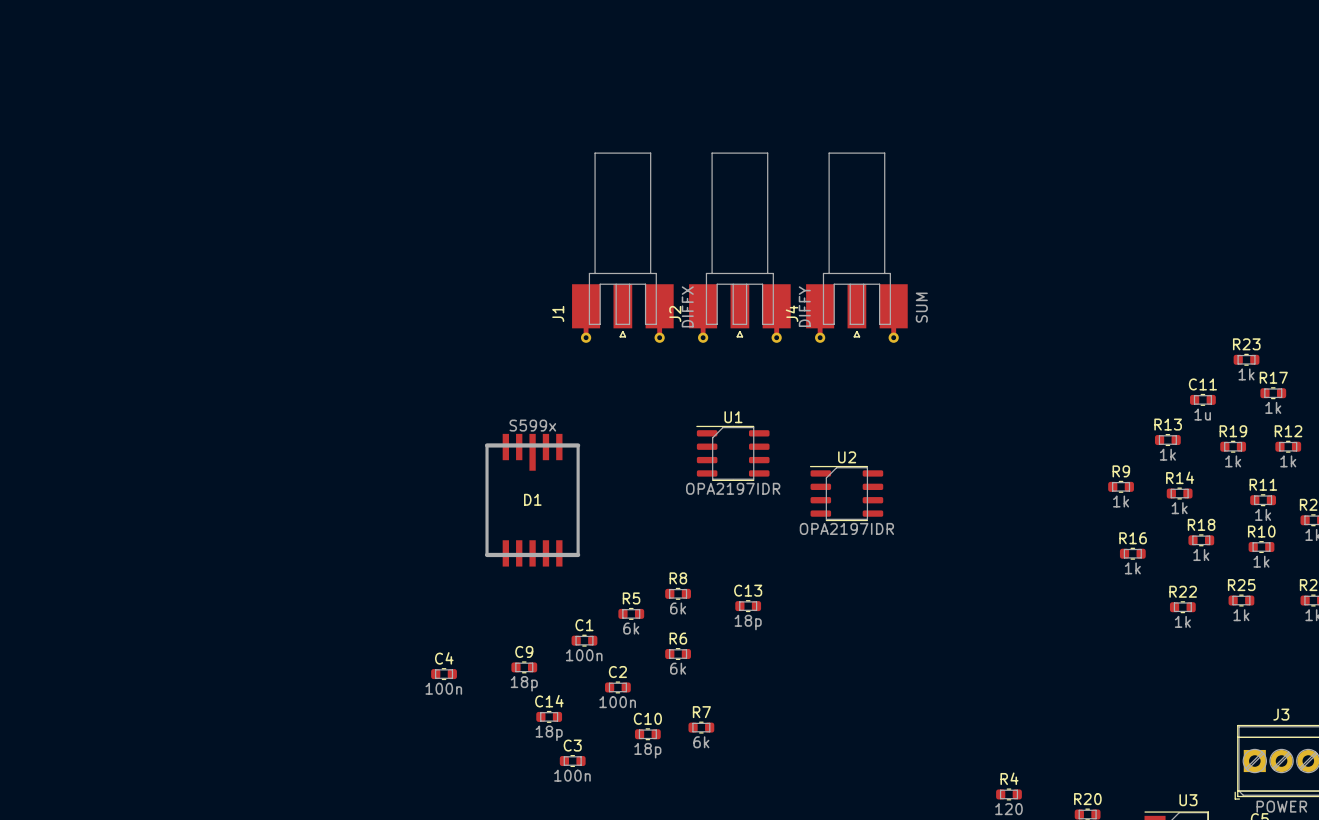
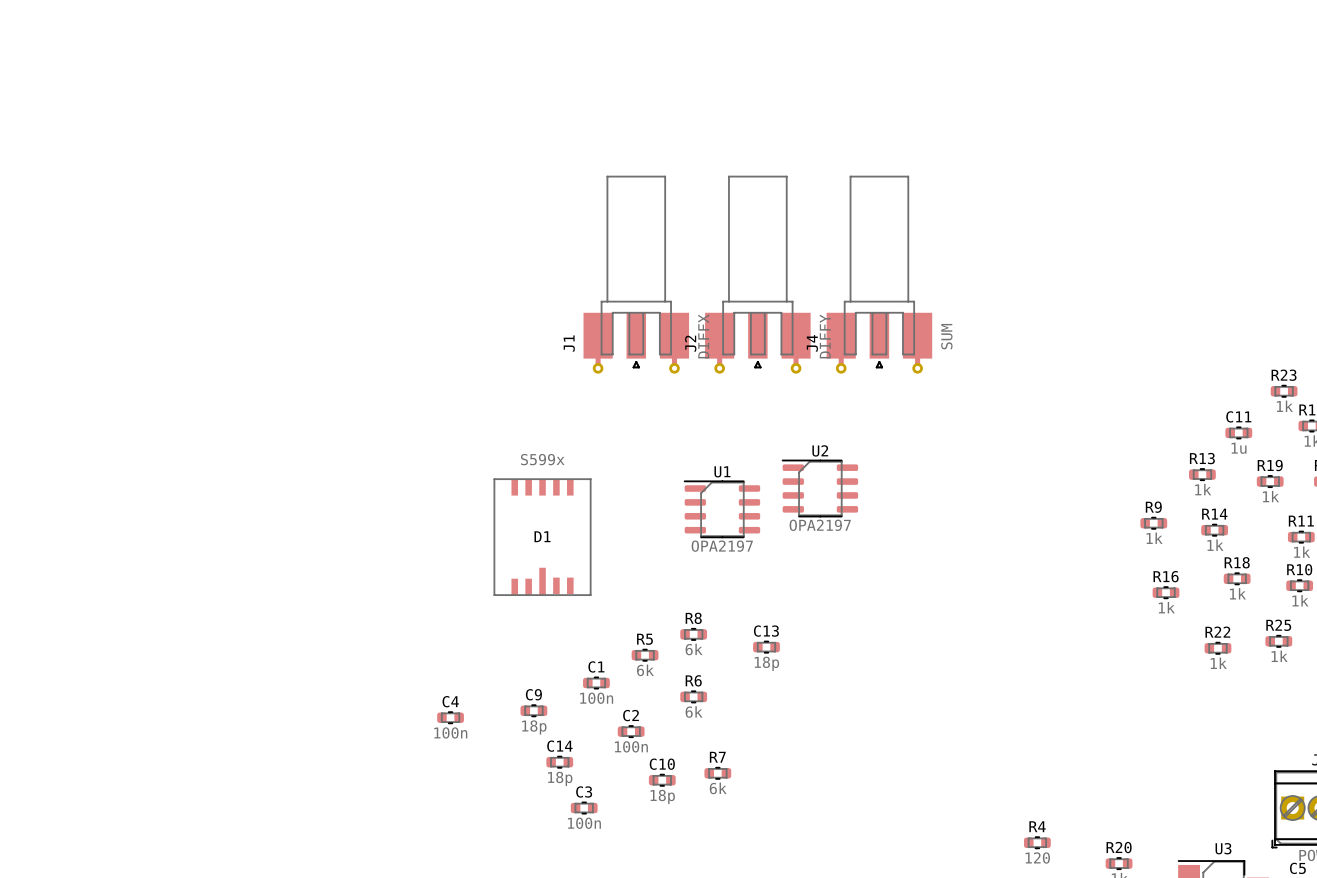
D1 footprint: [484, 433, 581, 567] -> [493, 478, 592, 596]
U1 position: (732, 453) -> (722, 509)
U1 value: OPA2197IDR (733, 488) -> OPA2197 (722, 546)
U2 position: (846, 493) -> (820, 488)
U2 value: OPA2197IDR (846, 528) -> OPA2197 (820, 525)

